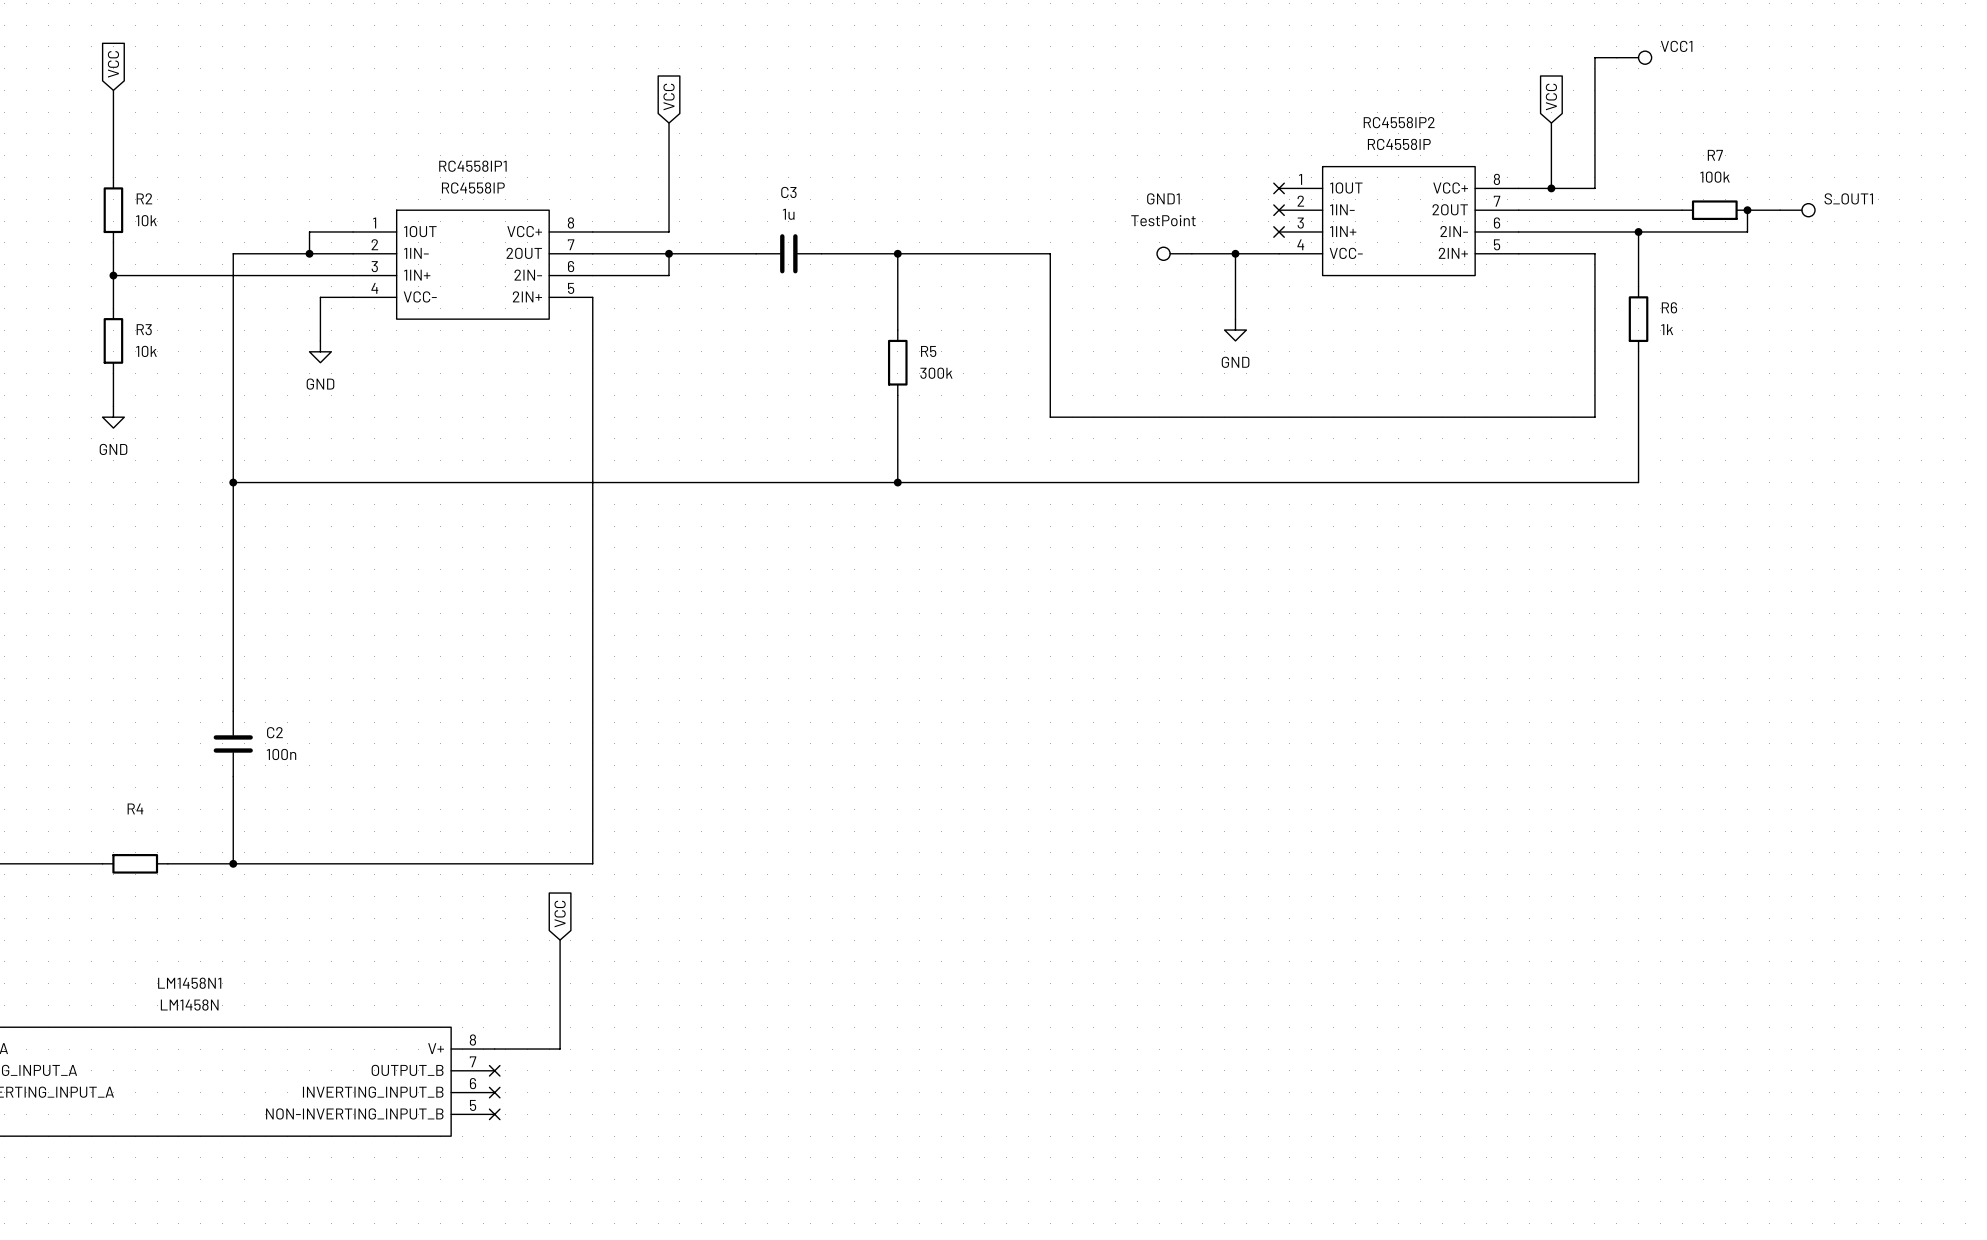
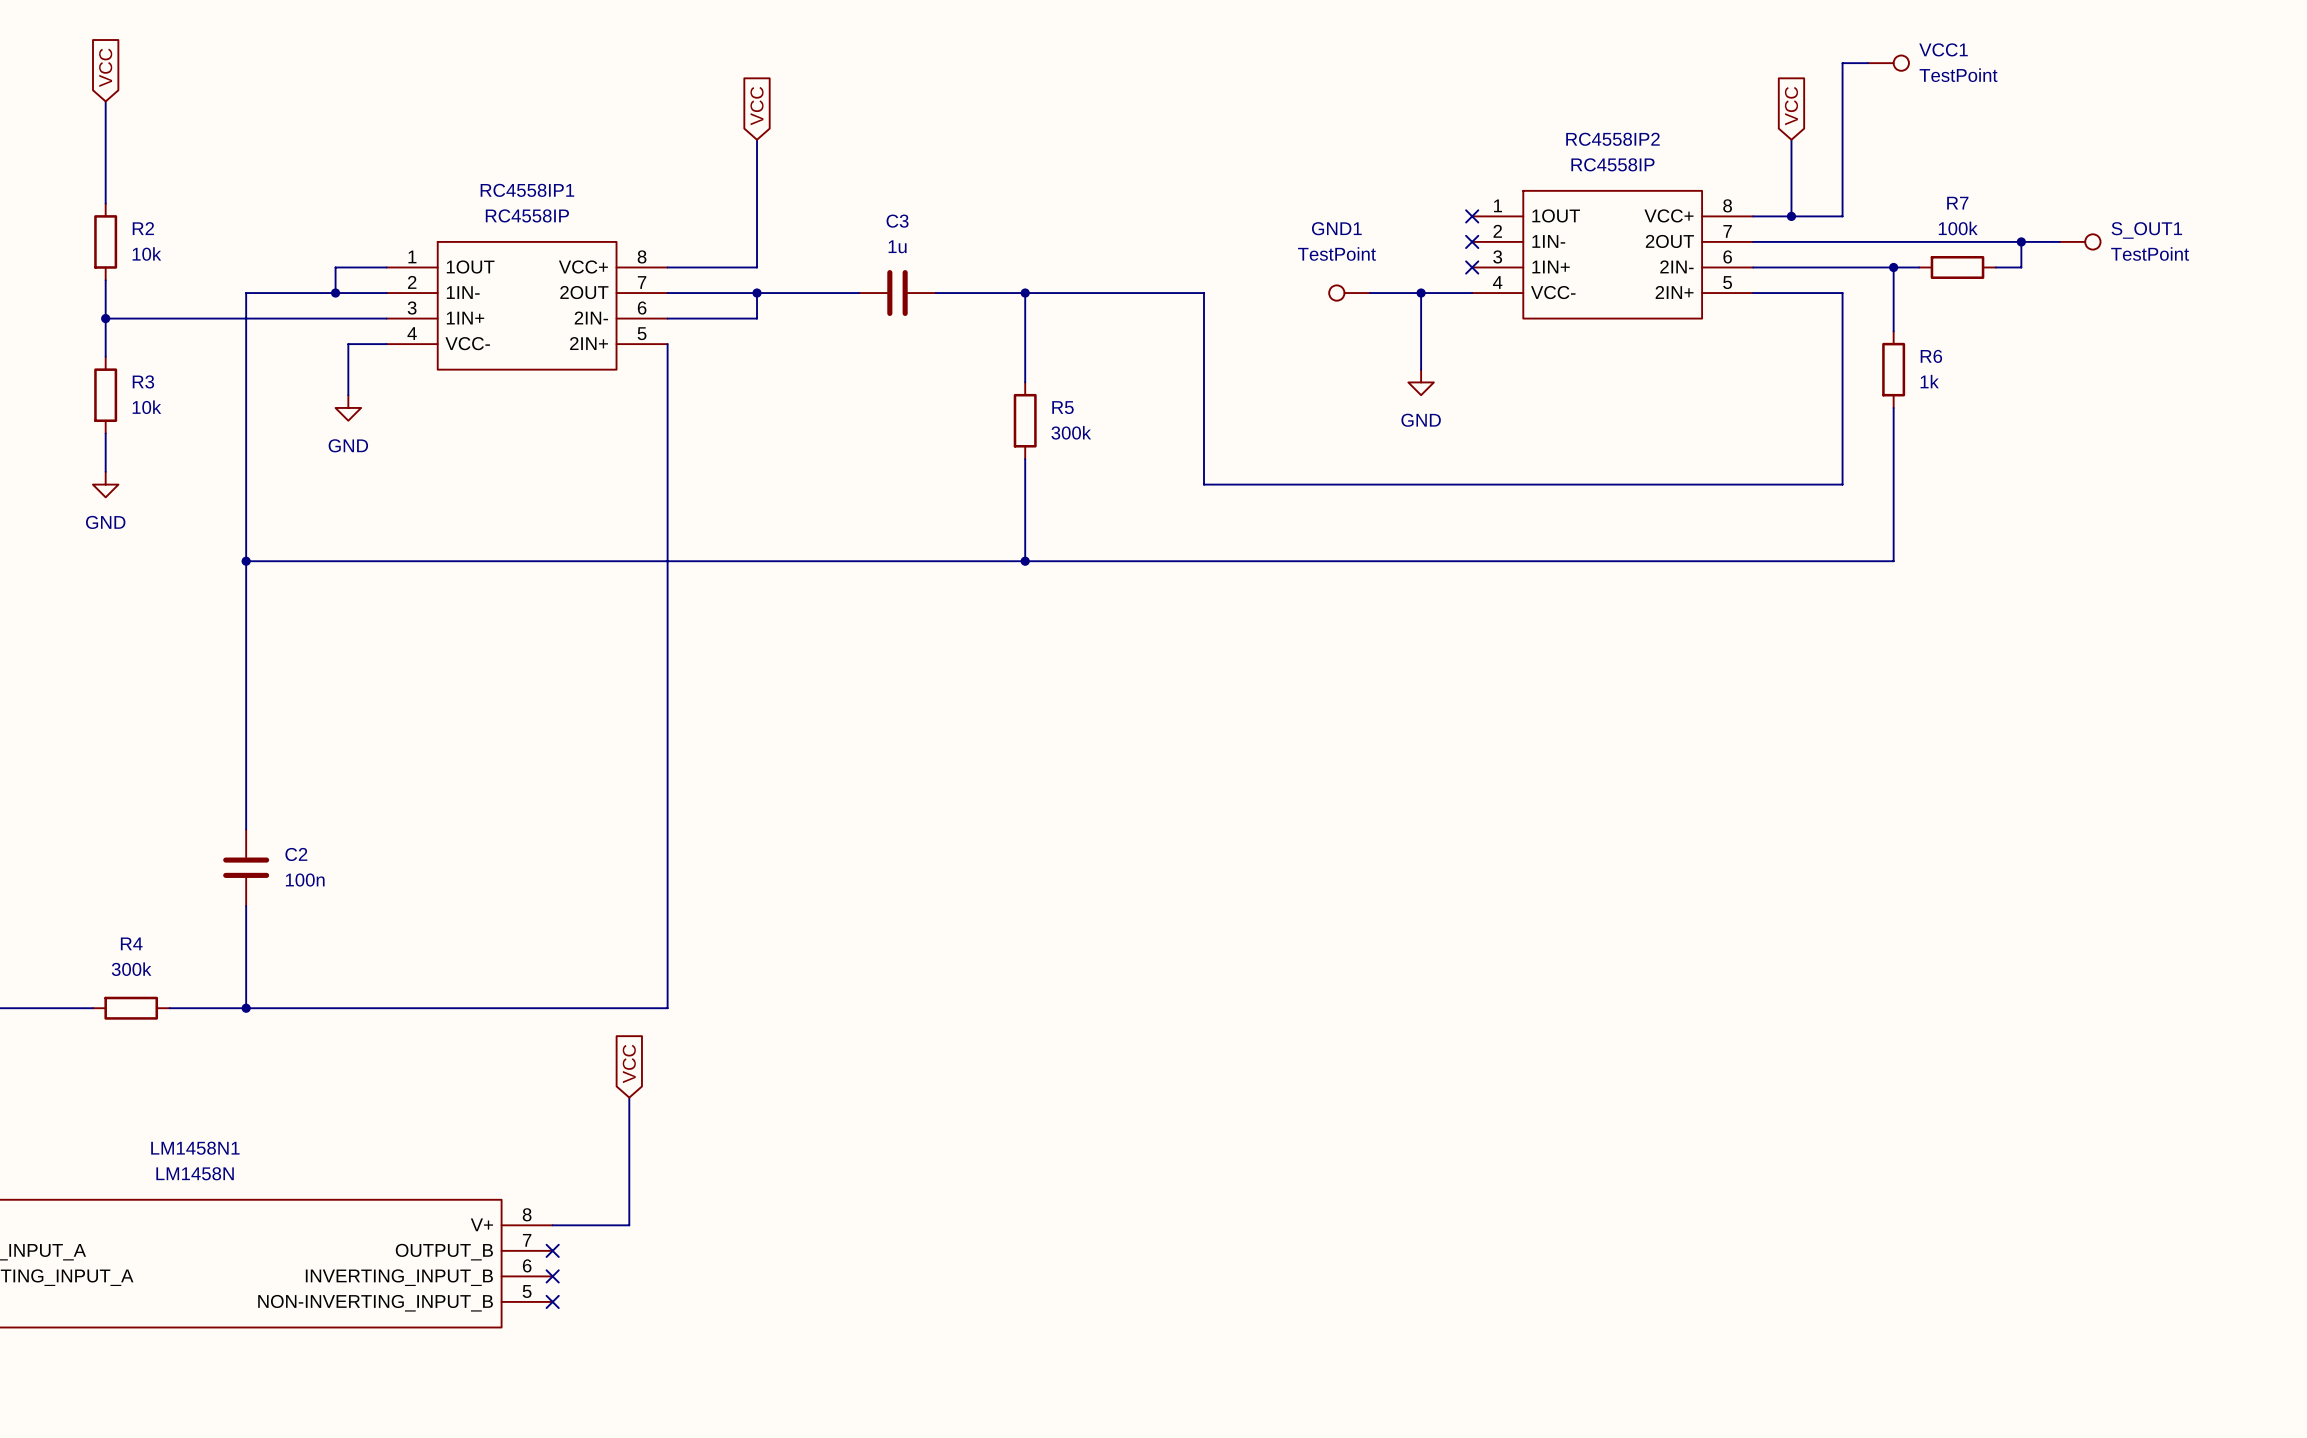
VCC1 value: none -> TestPoint (1958, 75)
R7 position: (1714, 210) -> (1957, 267)
S_OUT1 value: none -> TestPoint (2150, 253)
wire: (1660, 231) (1725, 231) -> (1944, 241) (2021, 241)
R4 value: none -> 300k (131, 969)

